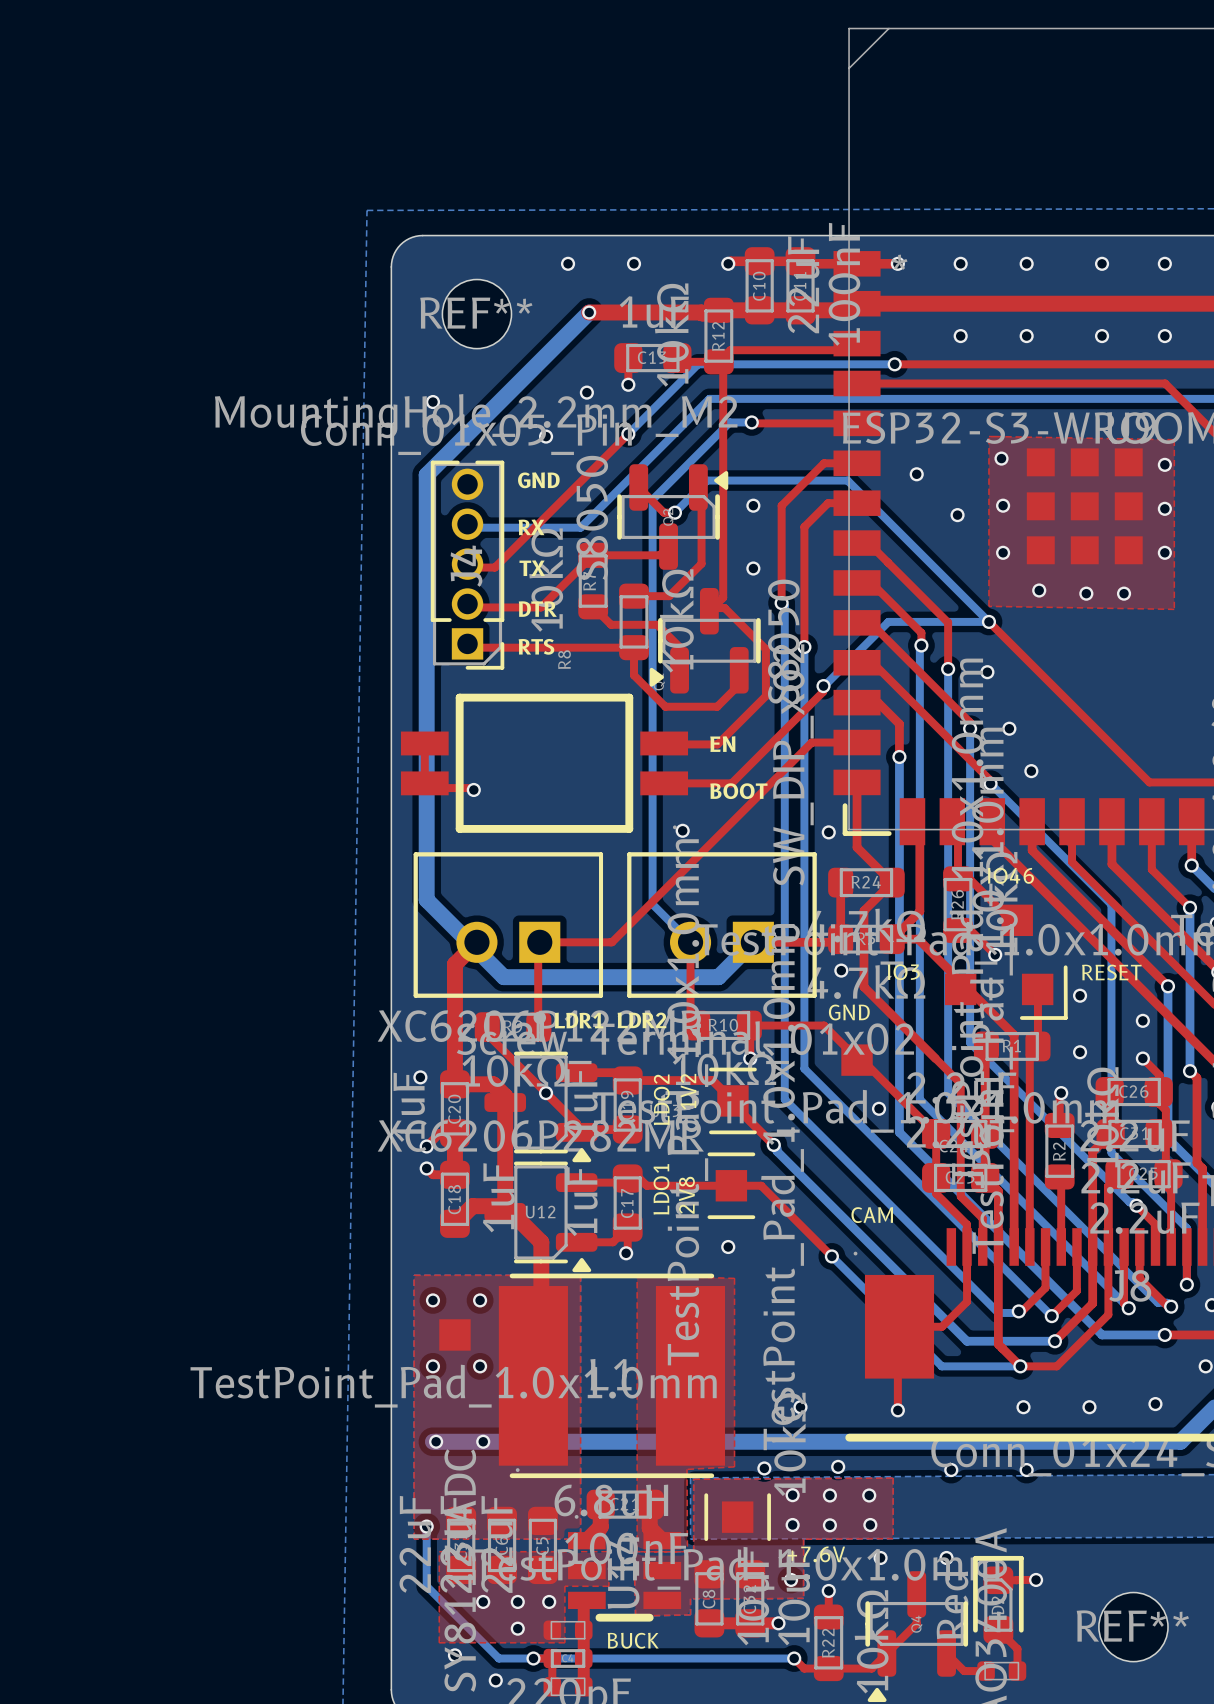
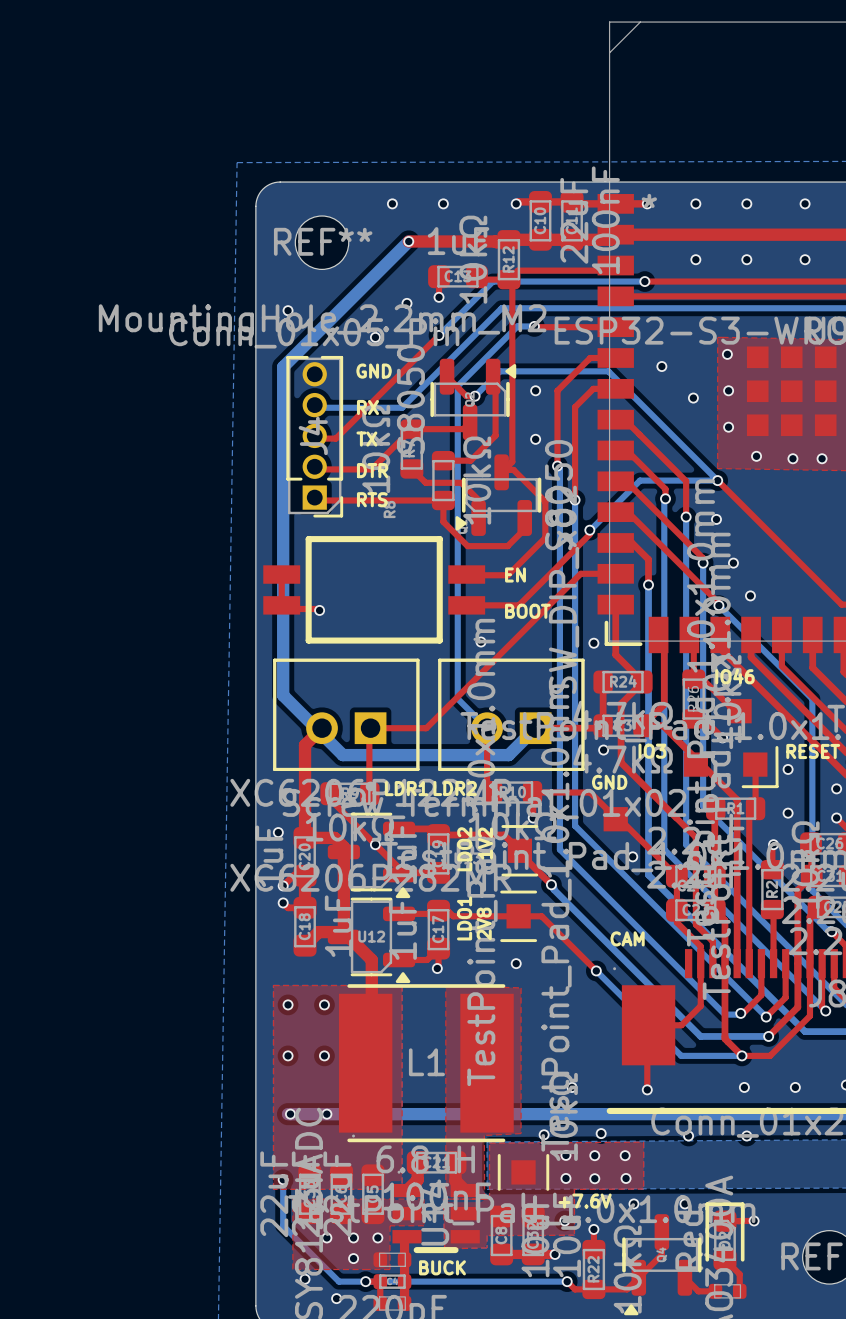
part: TestPoint_Pad_1.0x1.0mm (454, 1334) -> none

